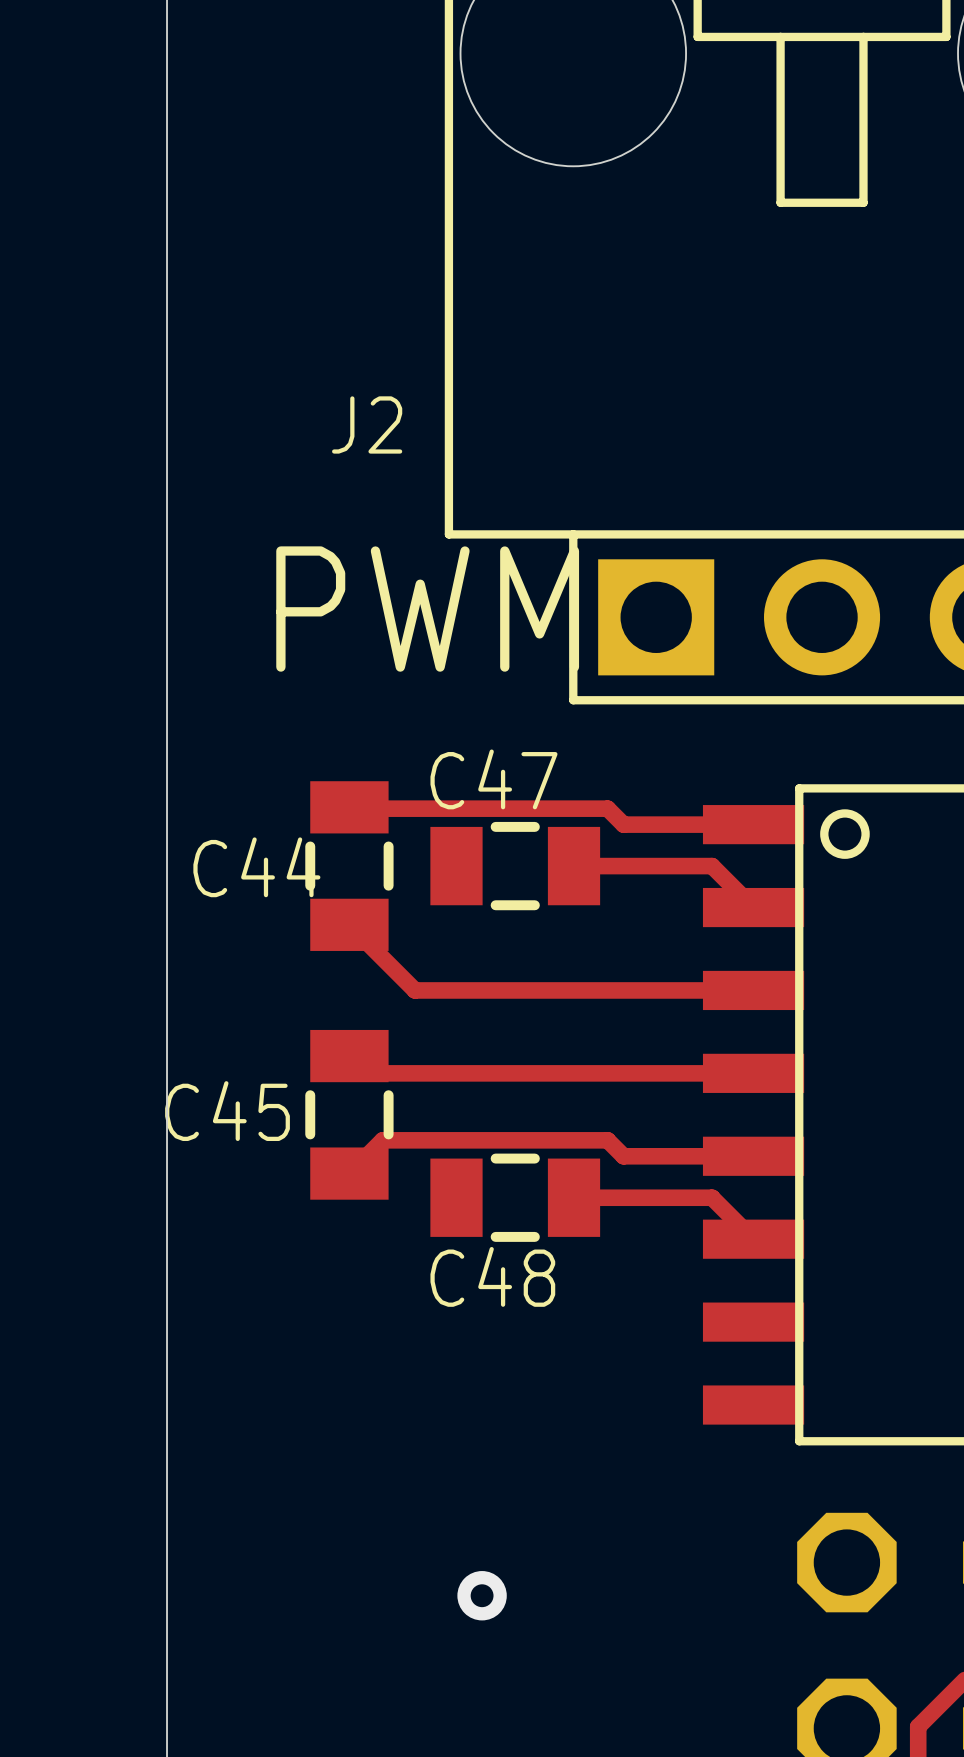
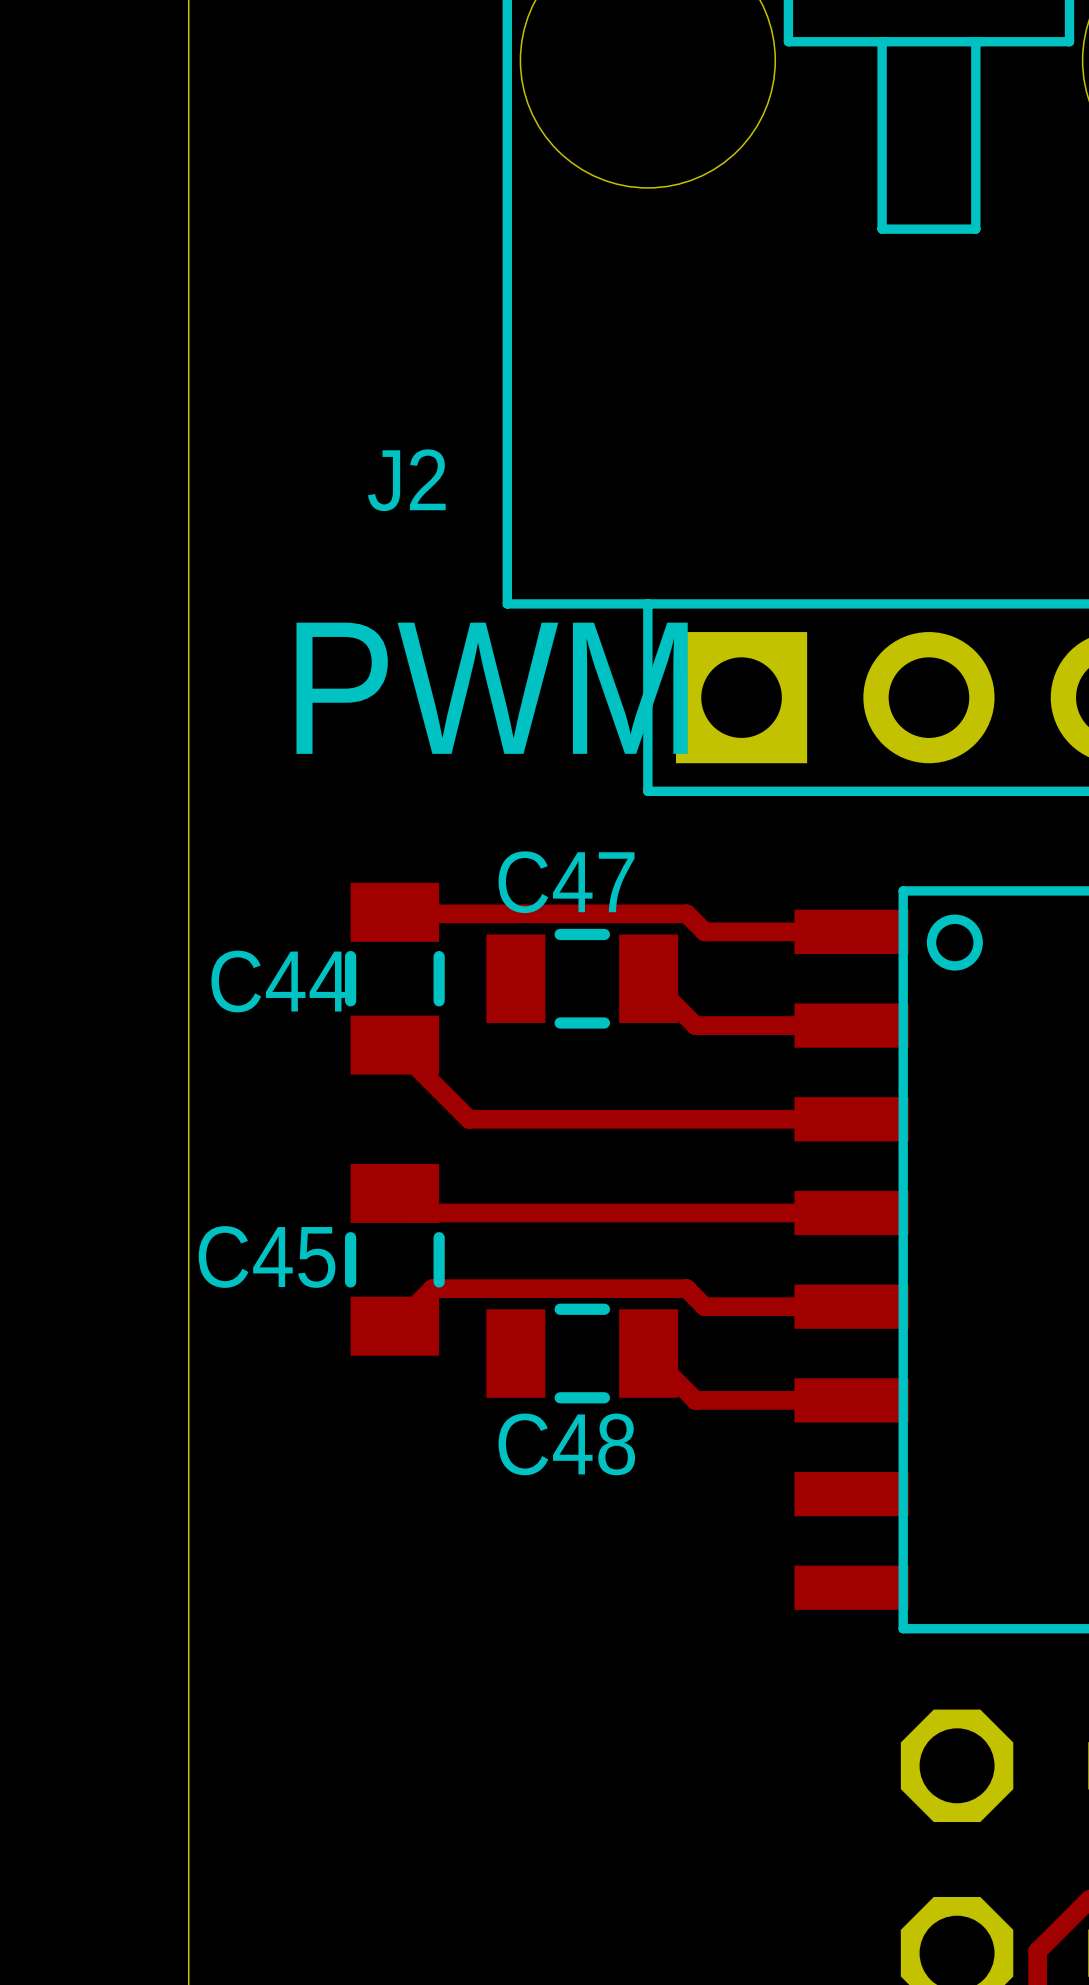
track: (574, 866) (712, 866) (753, 907) -> (648, 978) (695, 1025) (851, 1025)
track: (574, 1197) (712, 1197) (753, 1239) -> (648, 1353) (695, 1400) (851, 1400)
via: (482, 1595) -> none

